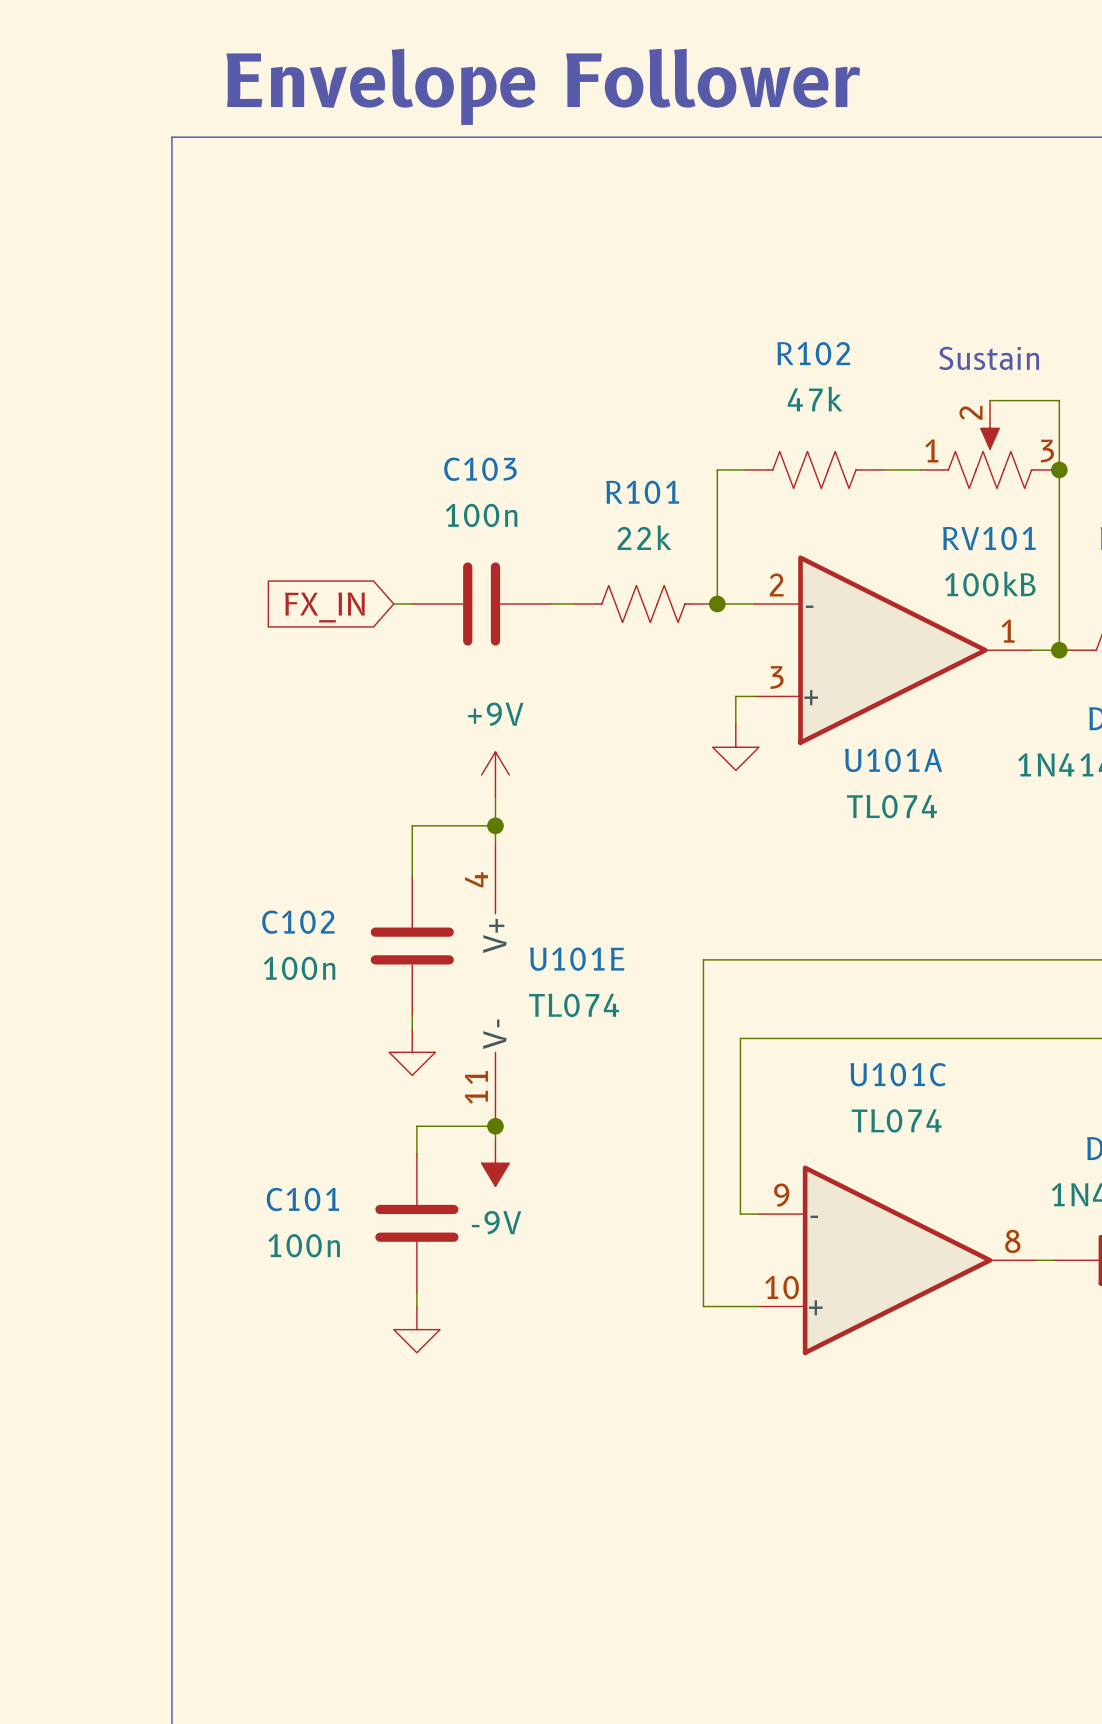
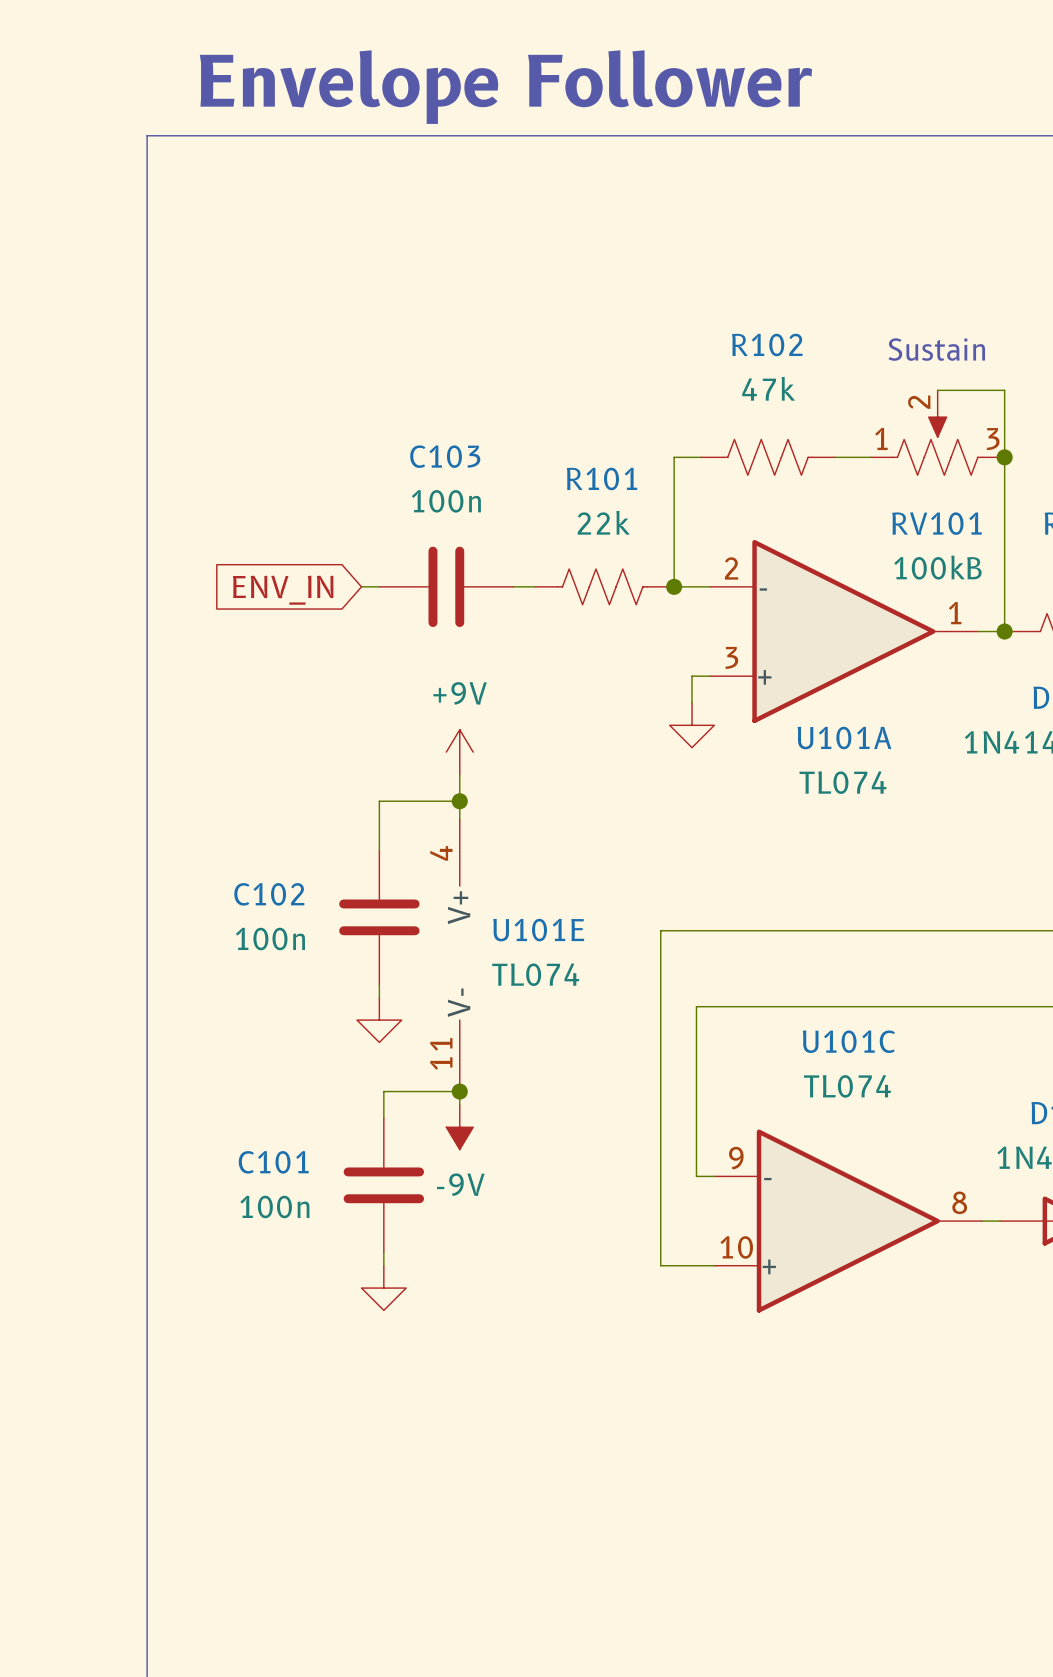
global label: FX_IN (324, 607) -> ENV_IN (283, 590)

